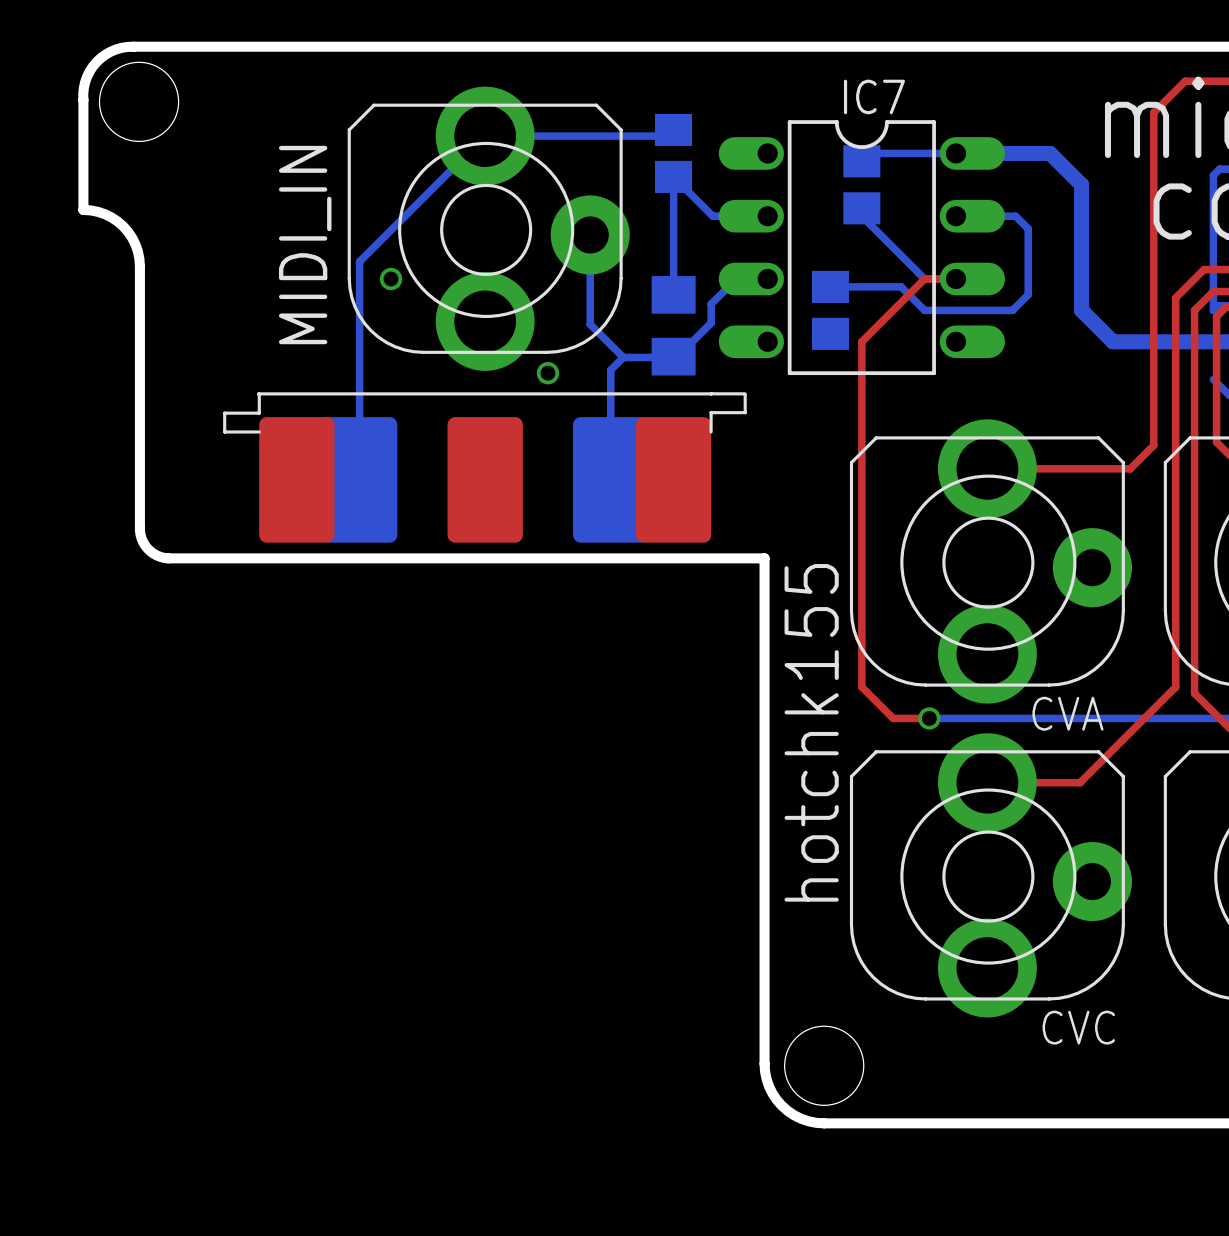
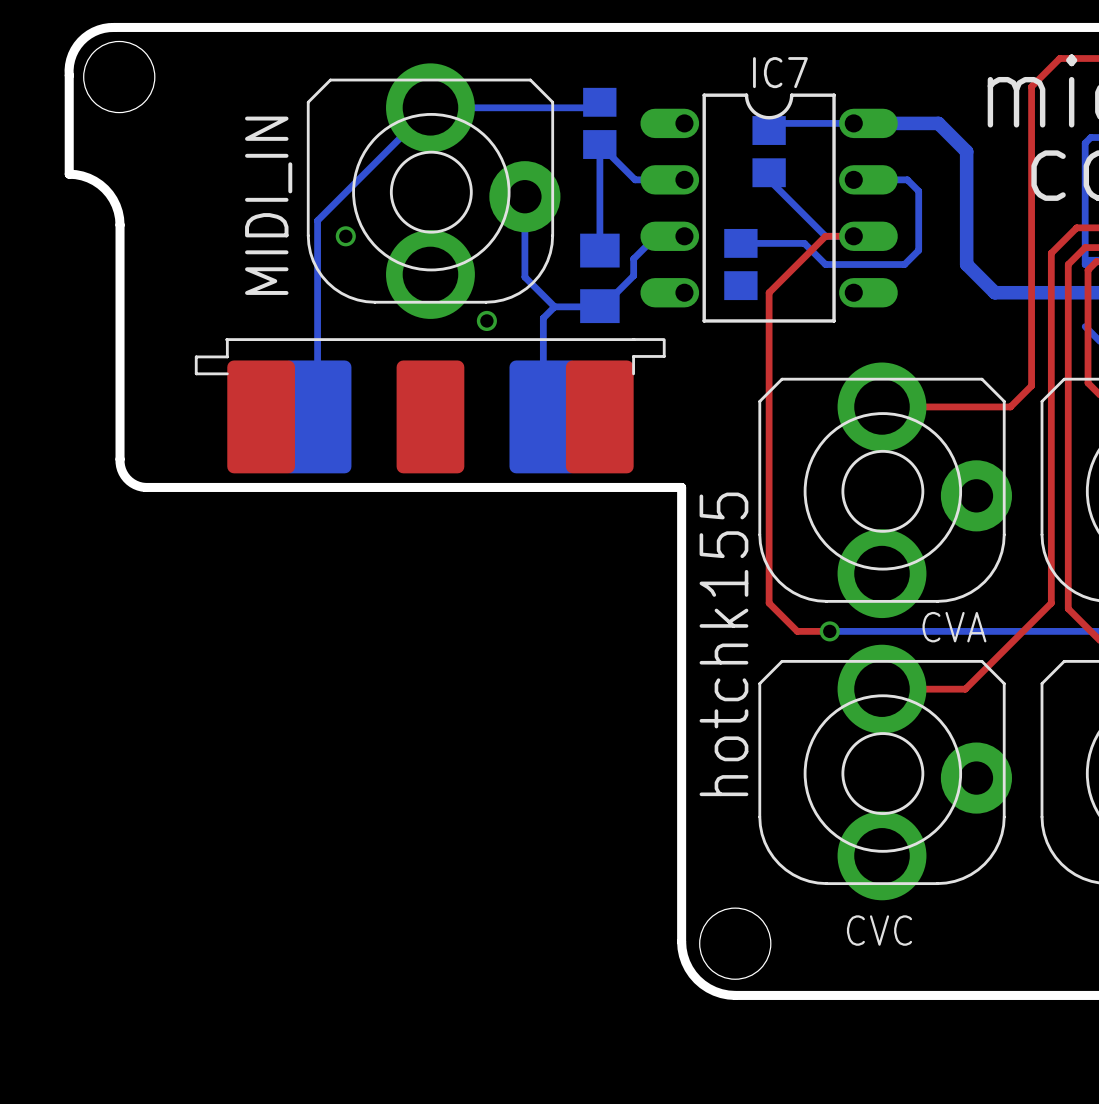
CVC name position: CVC (1078, 1027) -> CVC (879, 930)

